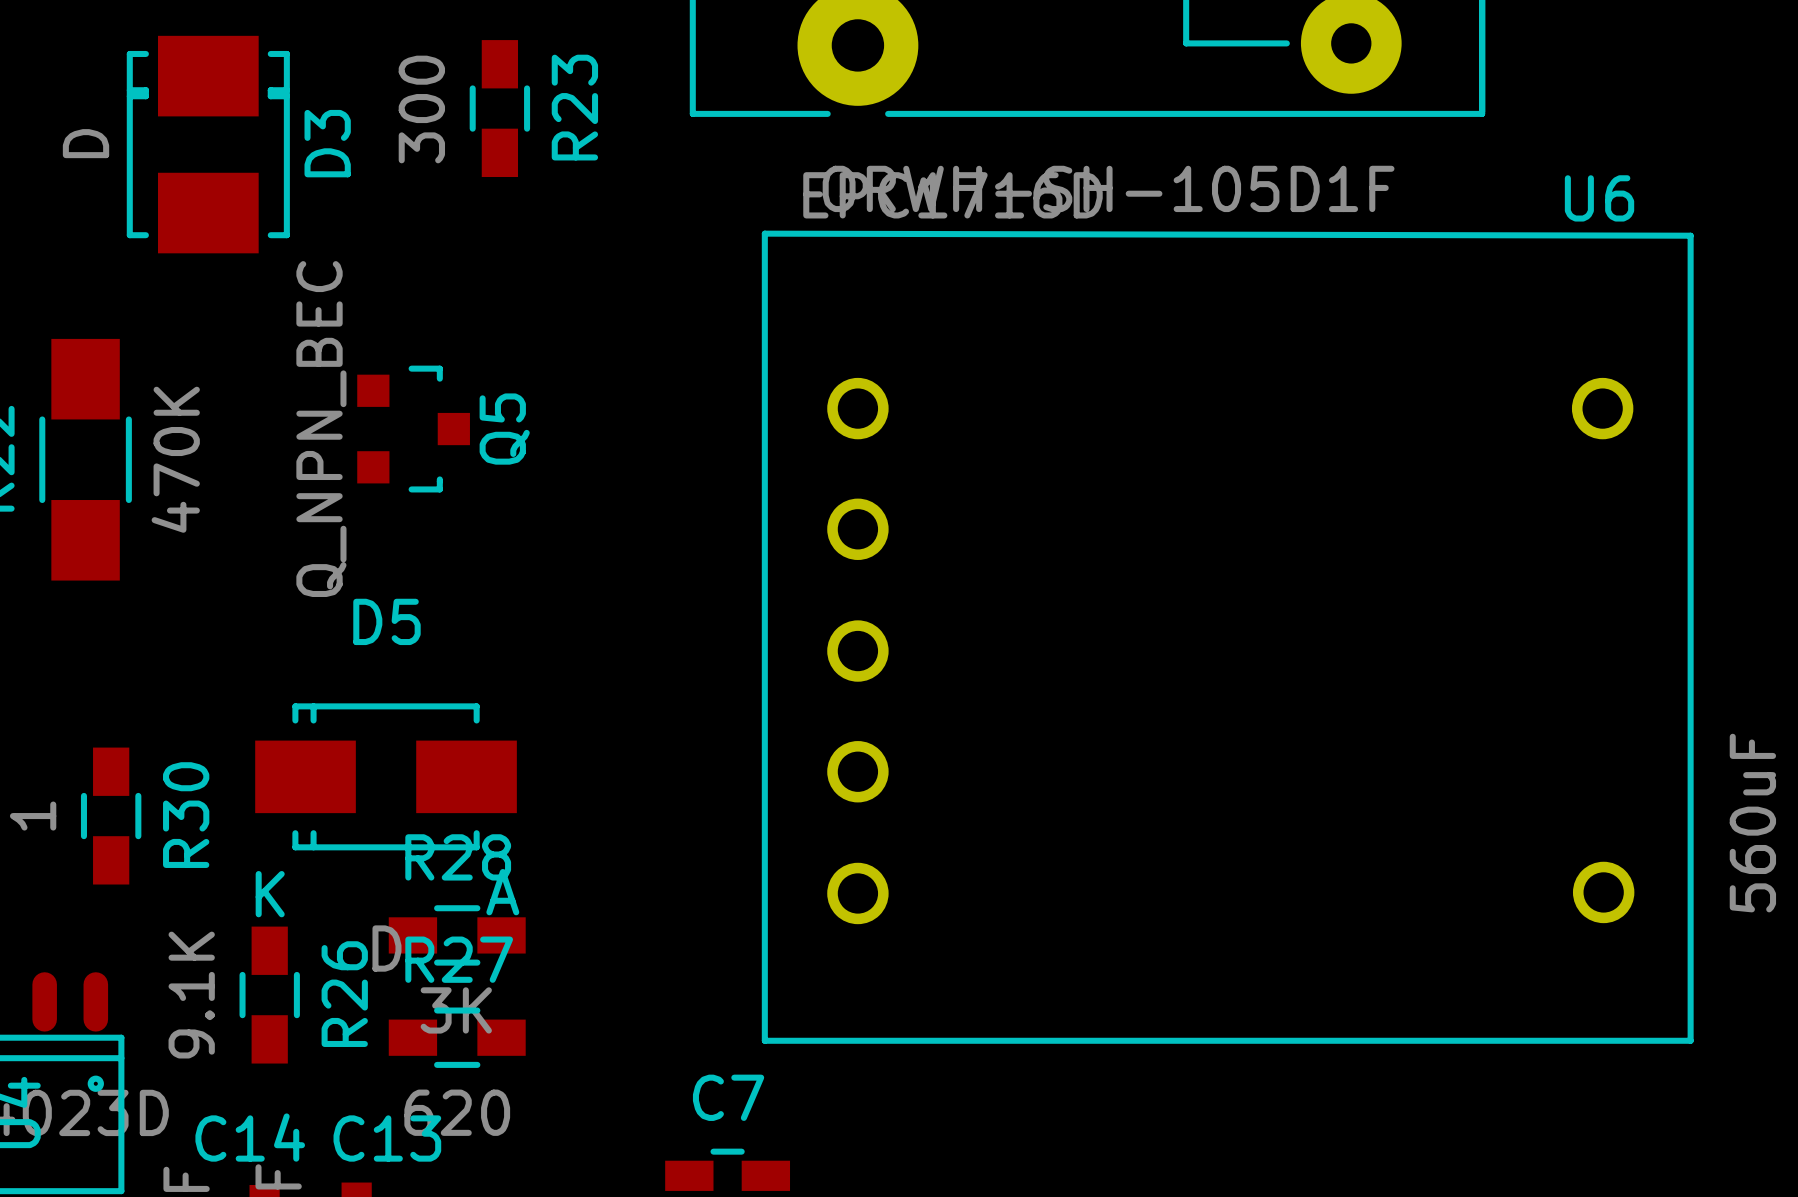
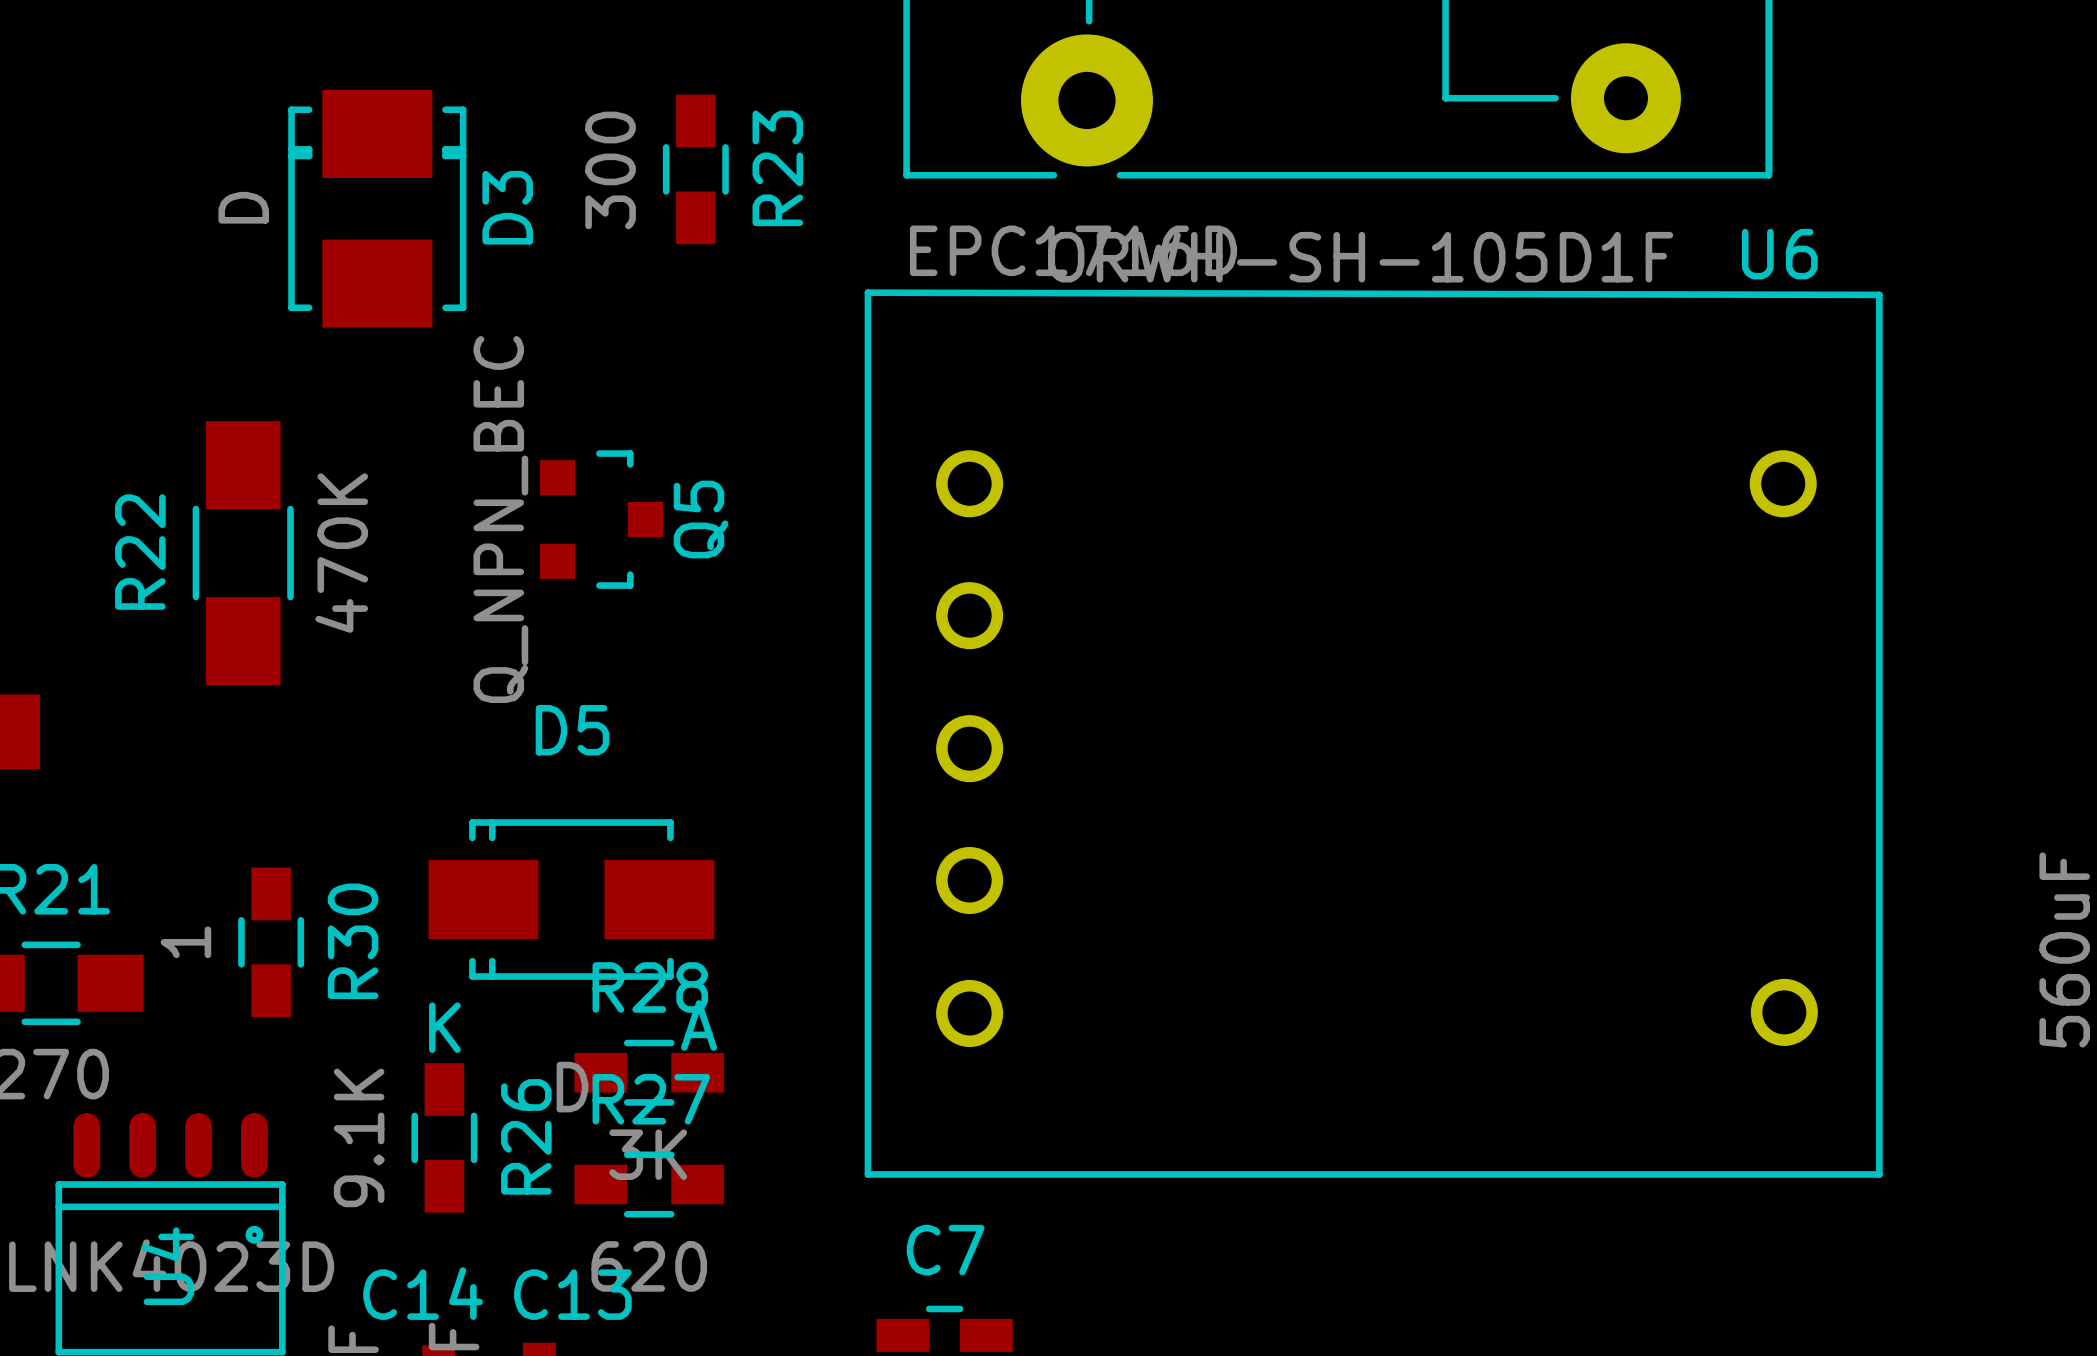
U6 position: (1227, 637) -> (1373, 733)

